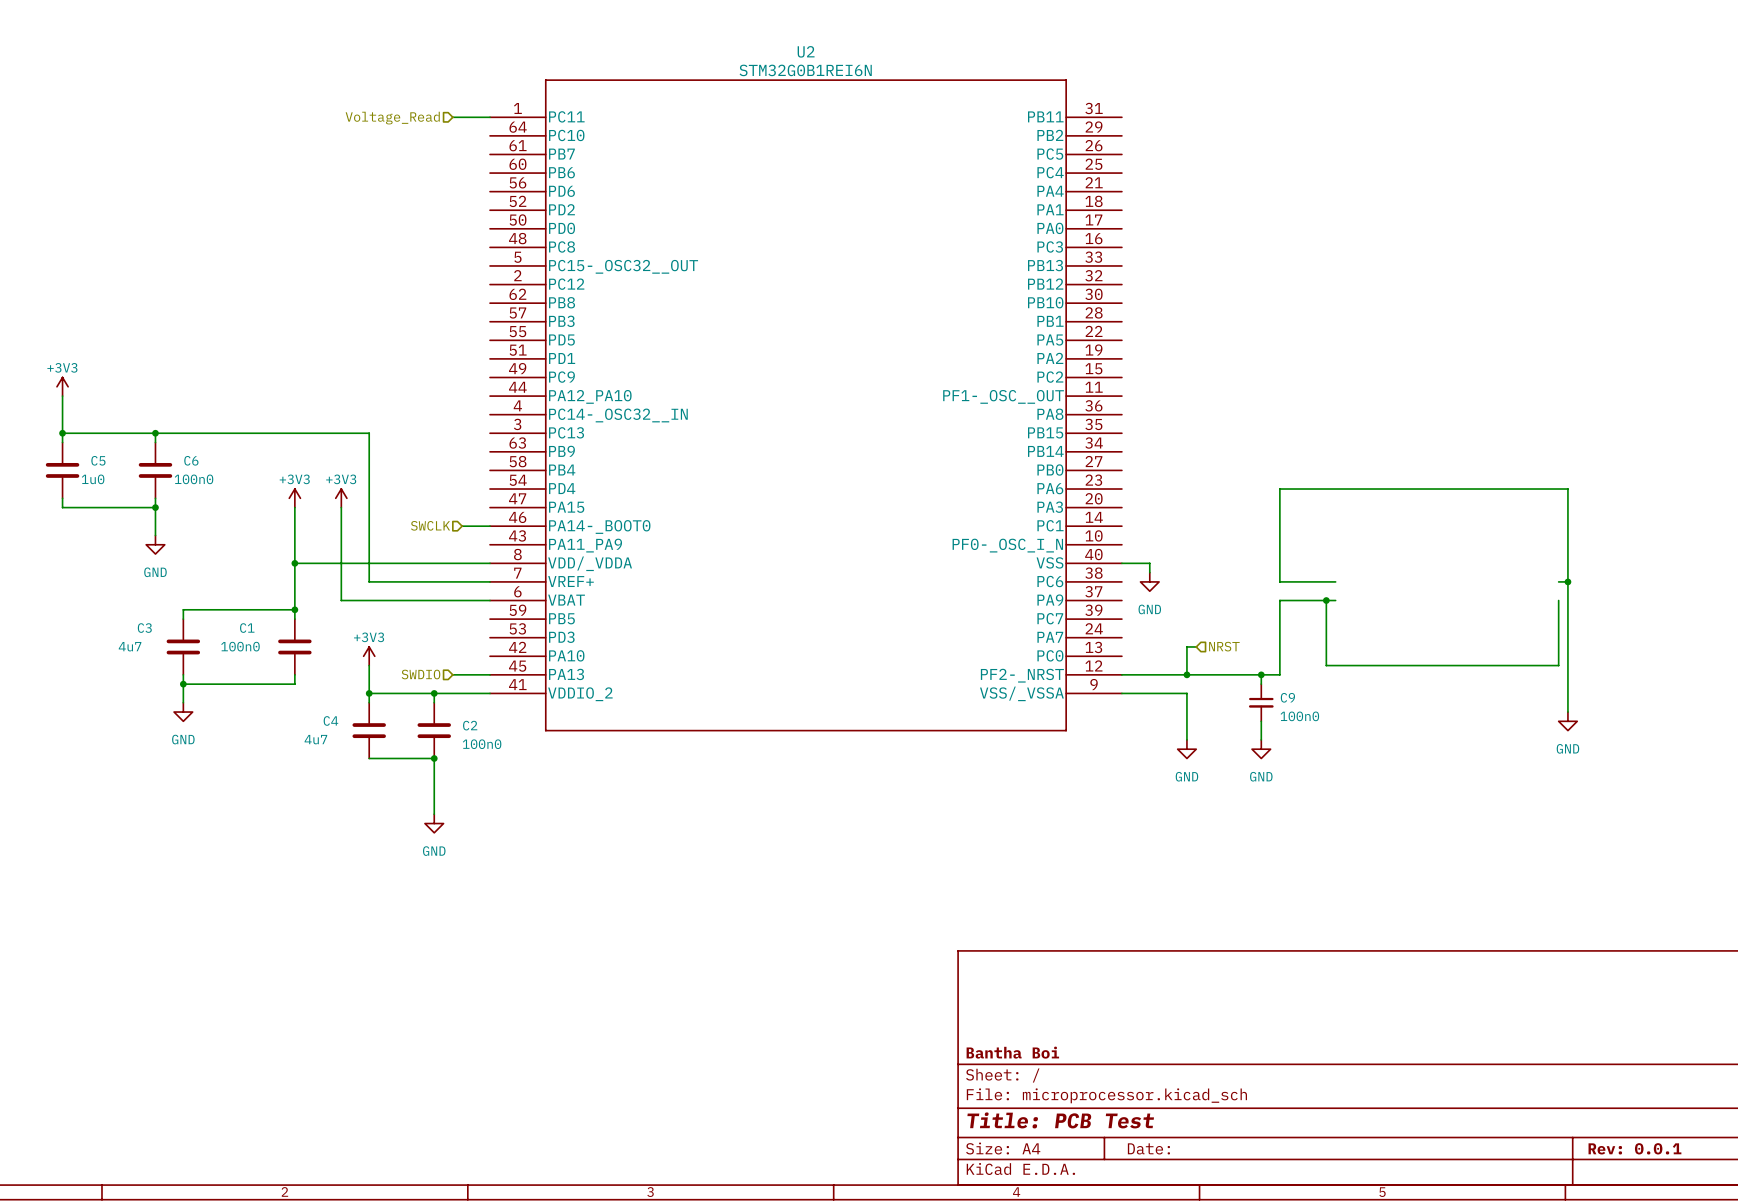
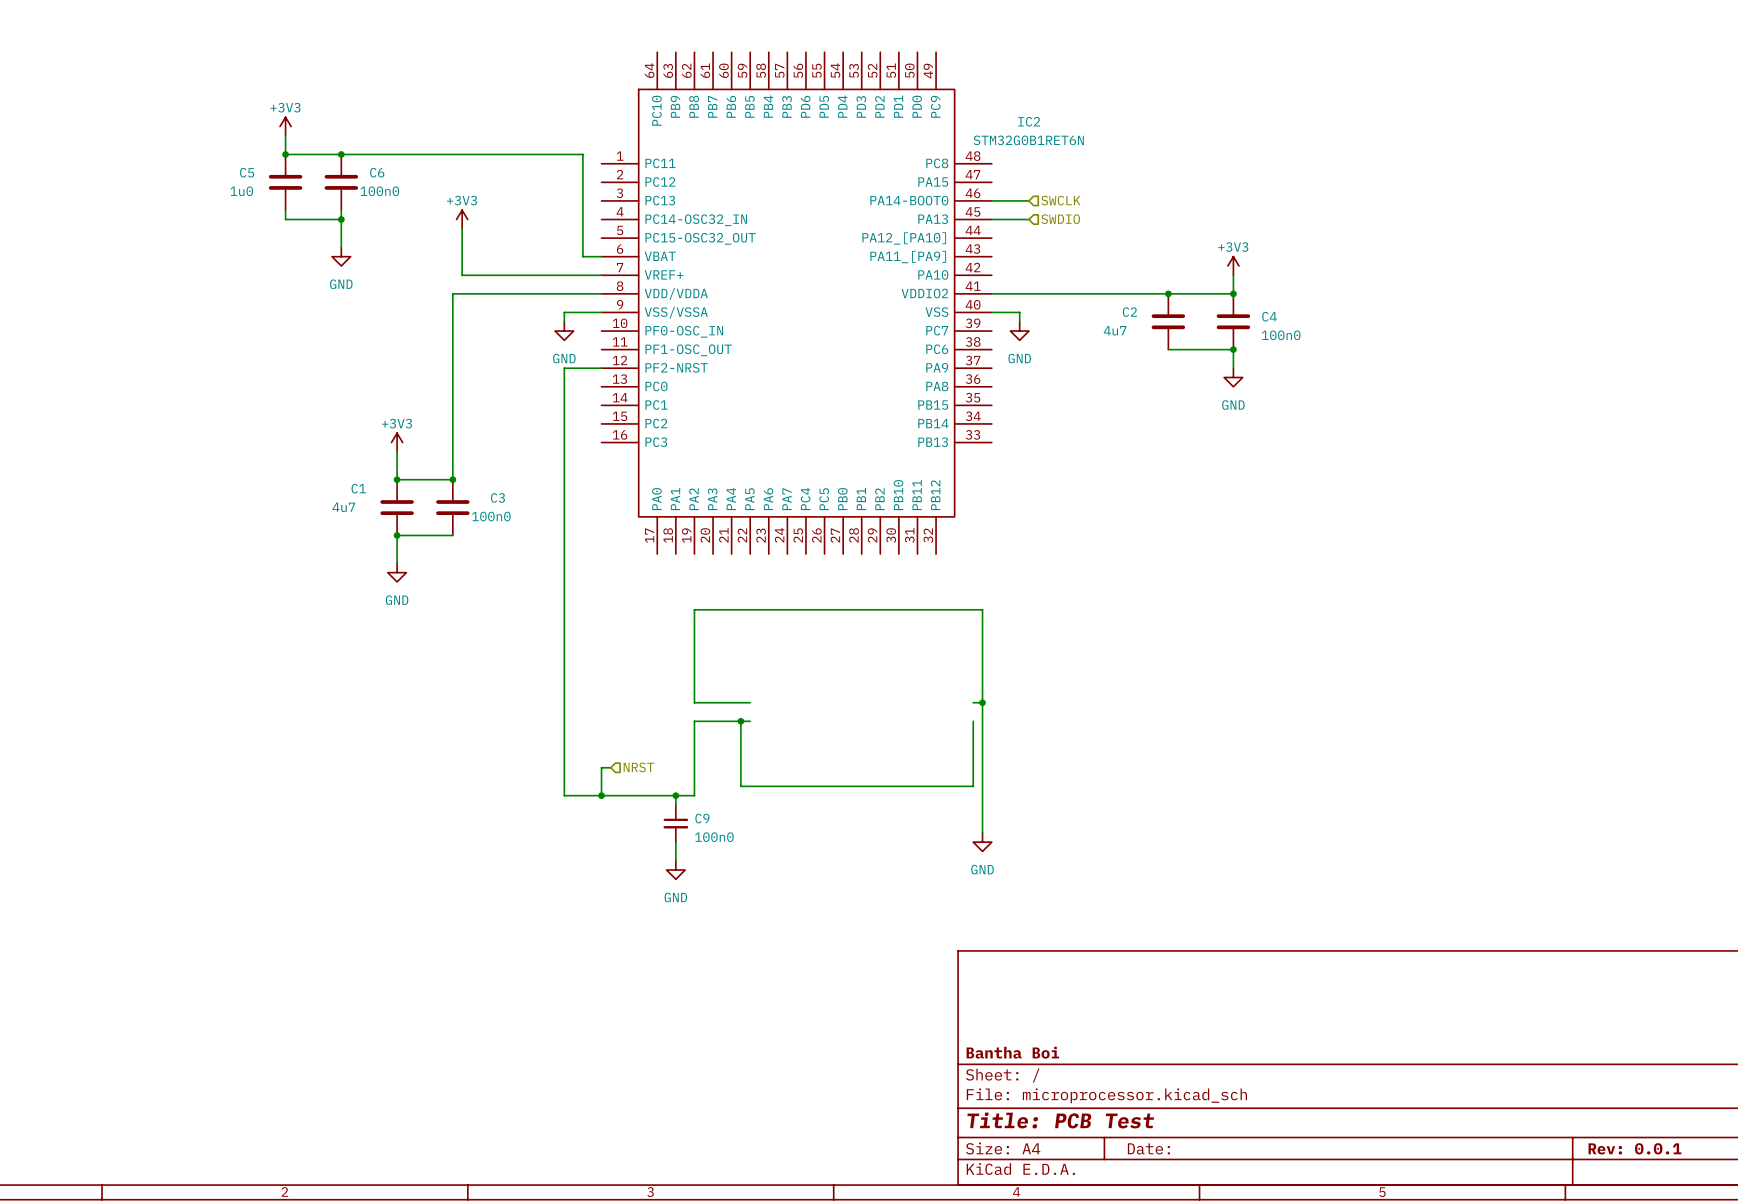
wire: (452, 117) (490, 117) -> none
hierarchical label: Voltage_Read (392, 118) -> none
power symbol: none -> +3V3 (285, 126)
wire: none -> (285, 135) (285, 154) (582, 154) (582, 256) (601, 256)
junction: none -> (285, 154)
junction: none -> (341, 154)
wire: none -> (991, 200) (1028, 200)
hierarchical label: none -> SWCLK (1060, 200)
wire: none -> (285, 210) (285, 219) (341, 219)
wire: none -> (341, 210) (341, 247)
junction: none -> (341, 219)
power symbol: none -> +3V3 (462, 219)
wire: none -> (991, 219) (1028, 219)
hierarchical label: none -> SWDIO (1060, 219)
wire: none -> (462, 228) (462, 275) (601, 275)
power symbol: none -> GND (341, 256)
power symbol: none -> +3V3 (1233, 265)
wire: none -> (1233, 275) (1233, 293) (991, 293)
wire: none -> (601, 293) (452, 293) (452, 479) (397, 479) (397, 451)
junction: none -> (1168, 293)
junction: none -> (1233, 293)
IC2: none -> STM32G0B1RET6N (796, 303)
wire: none -> (601, 312) (564, 312) (564, 321)
wire: none -> (991, 312) (1019, 312) (1019, 321)
power symbol: none -> GND (564, 331)
power symbol: none -> GND (1019, 331)
wire: none -> (1168, 349) (1233, 349) (1233, 368)
junction: none -> (1233, 349)
wire: none -> (601, 368) (564, 368) (564, 795) (694, 795) (694, 721) (750, 721)
power symbol: none -> GND (1233, 377)
power symbol: +3V3 (62, 386) -> none
wire: (62, 396) (62, 442) -> none
U2: STM32G0B1REI6N (805, 405) -> none
wire: (62, 433) (369, 433) (369, 581) (490, 581) -> none
junction: (62, 433) -> none
wire: (155, 433) (155, 442) -> none
junction: (155, 433) -> none
power symbol: none -> +3V3 (397, 442)
C5 name position: C5 (98, 460) -> C5 (247, 172)
C5 position: (62, 470) -> (285, 182)
C6 position: (155, 470) -> (341, 182)
C5 value position: 1u0 (93, 479) -> 1u0 (241, 191)
junction: none -> (397, 479)
junction: none -> (452, 479)
wire: (62, 498) (62, 507) (155, 507) -> none
wire: (155, 498) (155, 535) -> none
power symbol: +3V3 (294, 498) -> none
power symbol: +3V3 (341, 498) -> none
junction: (155, 507) -> none
wire: (294, 507) (294, 619) -> none
wire: (341, 507) (341, 600) (490, 600) -> none
hierarchical label: SWCLK (430, 525) -> none
wire: (462, 526) (490, 526) -> none
junction: none -> (397, 535)
wire: none -> (452, 535) (397, 535) (397, 563)
power symbol: GND (155, 544) -> none
wire: (294, 563) (490, 563) -> none
junction: (294, 563) -> none
wire: (1121, 563) (1149, 563) (1149, 572) -> none
power symbol: none -> GND (397, 572)
power symbol: GND (1149, 581) -> none
wire: (1335, 581) (1279, 581) (1279, 489) (1567, 489) (1567, 712) -> none
wire: (1558, 581) (1567, 581) -> none
junction: (1567, 581) -> none
wire: (1326, 600) (1326, 665) (1558, 665) (1558, 600) -> none
junction: (1326, 600) -> none
wire: (1335, 600) (1279, 600) (1279, 674) (1121, 674) -> none
wire: (294, 609) (183, 609) (183, 619) -> none
junction: (294, 609) -> none
C3 name position: C3 (144, 628) -> C3 (497, 497)
C1 name position: C1 (247, 628) -> C1 (358, 488)
C3 value: 4u7 (130, 646) -> 100n0 (491, 516)
C3 position: (183, 646) -> (452, 507)
C1 value: 100n0 (240, 646) -> 4u7 (343, 507)
C1 position: (294, 646) -> (397, 507)
wire: (1196, 646) (1186, 646) (1186, 674) -> none
hierarchical label: NRST (1224, 646) -> none
power symbol: +3V3 (369, 656) -> none
wire: (369, 665) (369, 702) -> none
wire: (183, 674) (183, 702) -> none
wire: (294, 674) (294, 684) (183, 684) -> none
hierarchical label: SWDIO (420, 674) -> none
wire: (452, 674) (490, 674) -> none
junction: (1186, 674) -> none
wire: (1261, 674) (1261, 684) -> none
junction: (1261, 674) -> none
junction: (183, 684) -> none
wire: (369, 693) (490, 693) -> none
junction: (369, 693) -> none
wire: (434, 693) (434, 702) -> none
junction: (434, 693) -> none
wire: (1121, 693) (1186, 693) (1186, 739) -> none
wire: none -> (750, 702) (694, 702) (694, 609) (982, 609) (982, 832)
wire: none -> (973, 702) (982, 702)
junction: none -> (982, 702)
C9 position: (1261, 702) -> (675, 823)
power symbol: GND (183, 712) -> none
C4 name position: C4 (330, 720) -> C4 (1269, 316)
wire: none -> (740, 721) (740, 786) (973, 786) (973, 721)
junction: none -> (740, 721)
wire: (1261, 721) (1261, 739) -> none
power symbol: GND (1567, 721) -> none
C2 name position: C2 (470, 725) -> C2 (1129, 312)
C4 position: (369, 730) -> (1233, 321)
C2 position: (434, 730) -> (1168, 321)
C4 value: 4u7 (315, 739) -> 100n0 (1281, 335)
C2 value: 100n0 (482, 744) -> 4u7 (1115, 330)
power symbol: GND (1186, 749) -> none
power symbol: GND (1261, 749) -> none
wire: (369, 758) (434, 758) (434, 814) -> none
junction: (434, 758) -> none
wire: none -> (610, 767) (601, 767) (601, 795)
hierarchical label: none -> NRST (638, 767)
junction: none -> (601, 795)
wire: none -> (675, 795) (675, 804)
junction: none -> (675, 795)
power symbol: GND (434, 823) -> none
wire: none -> (675, 842) (675, 860)
power symbol: none -> GND (982, 842)
power symbol: none -> GND (675, 870)

